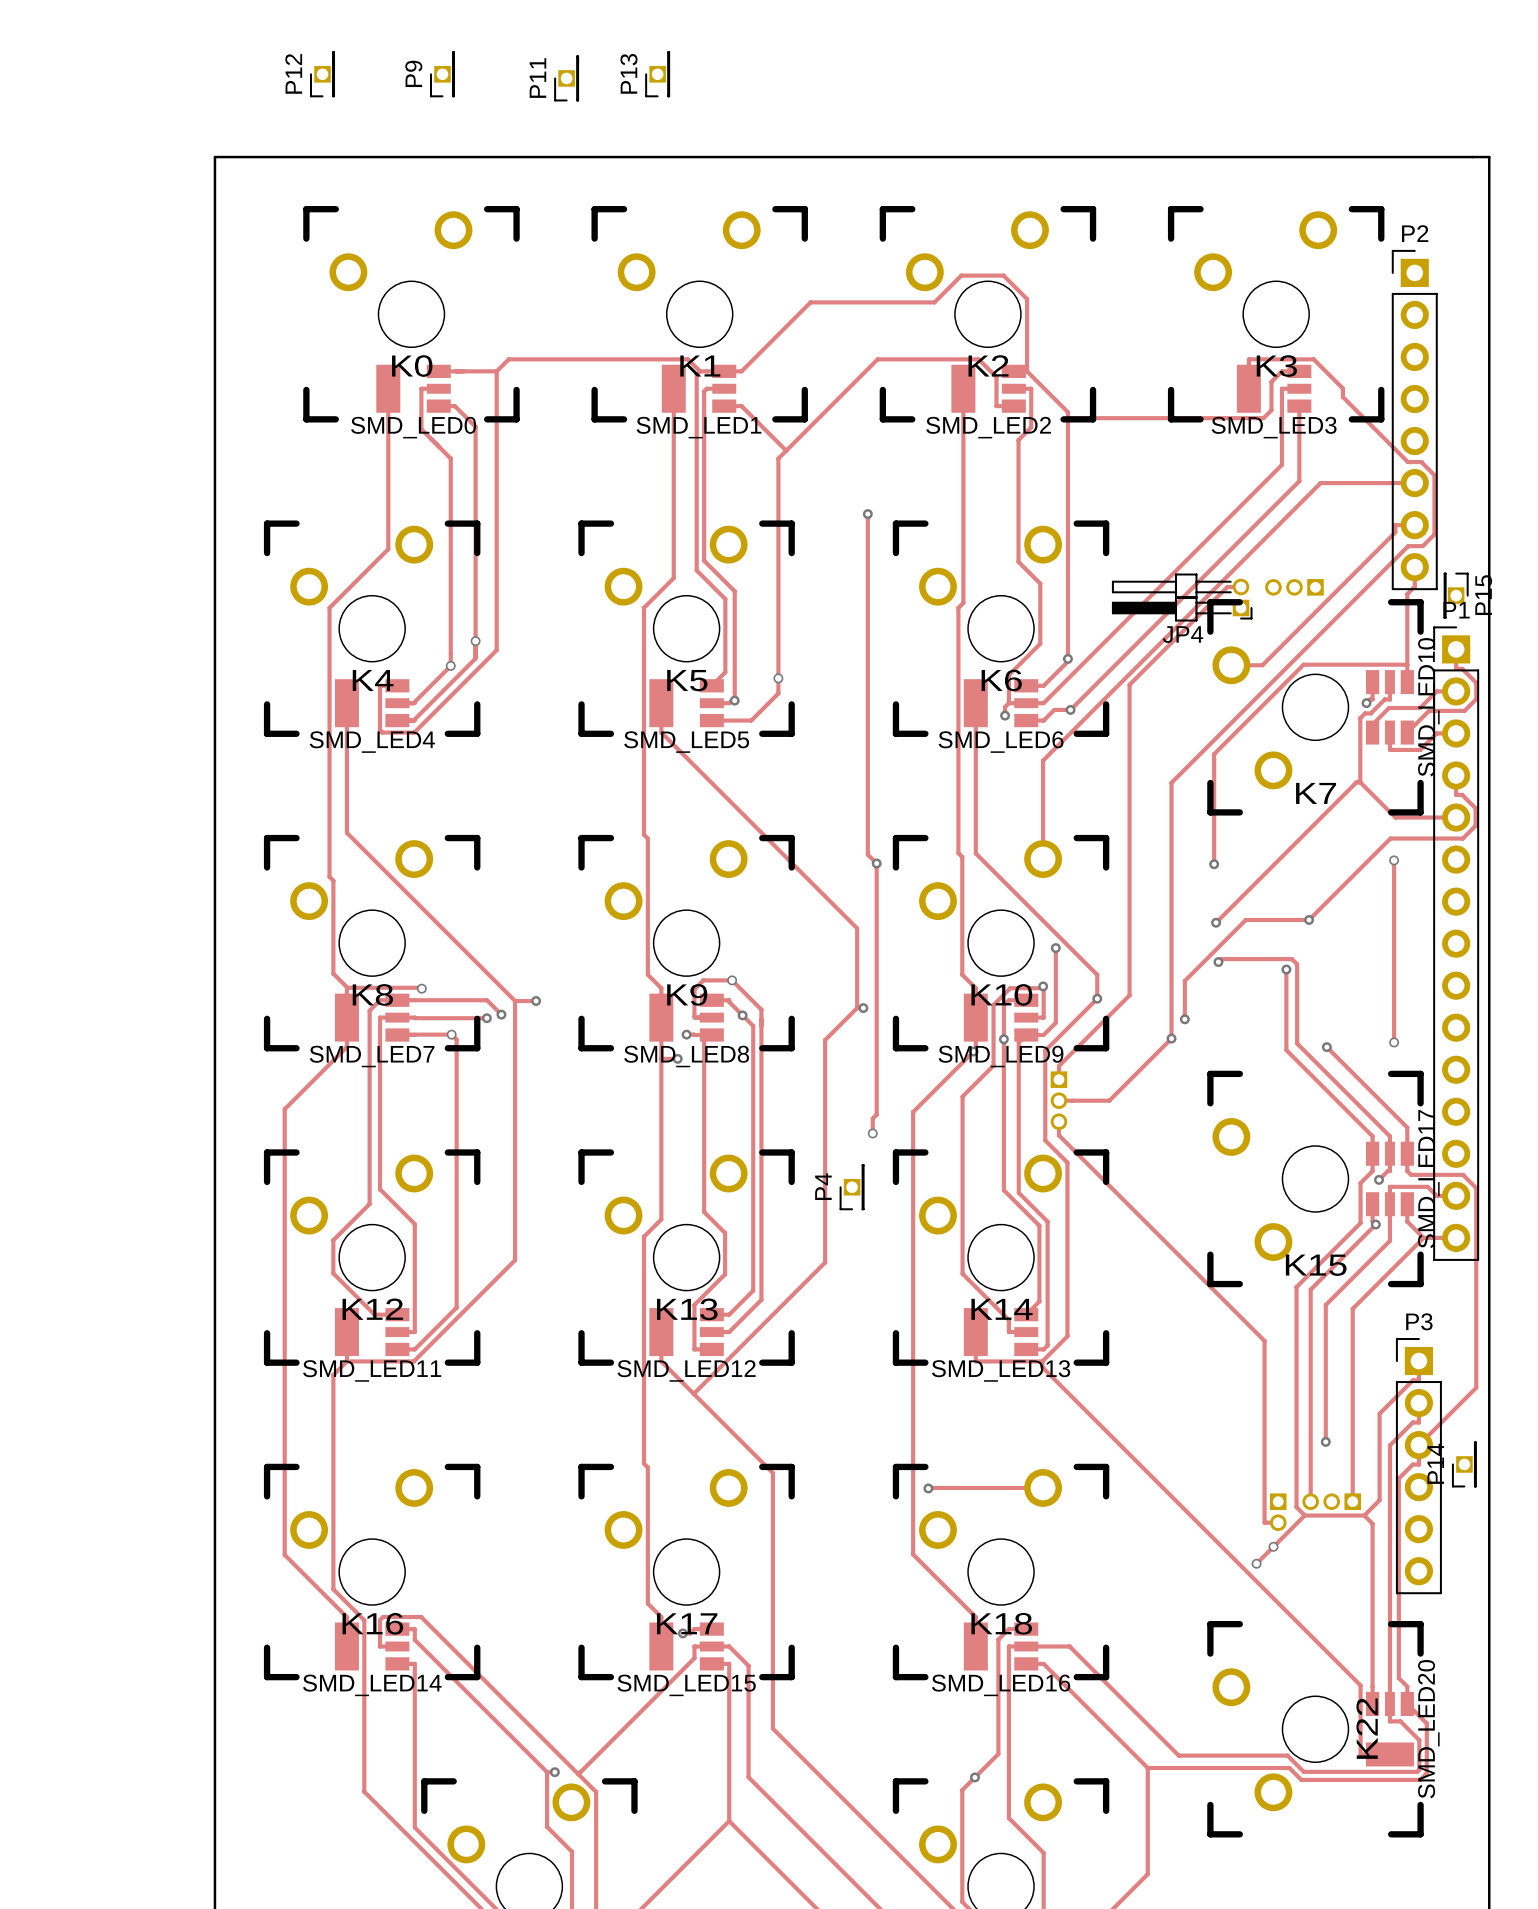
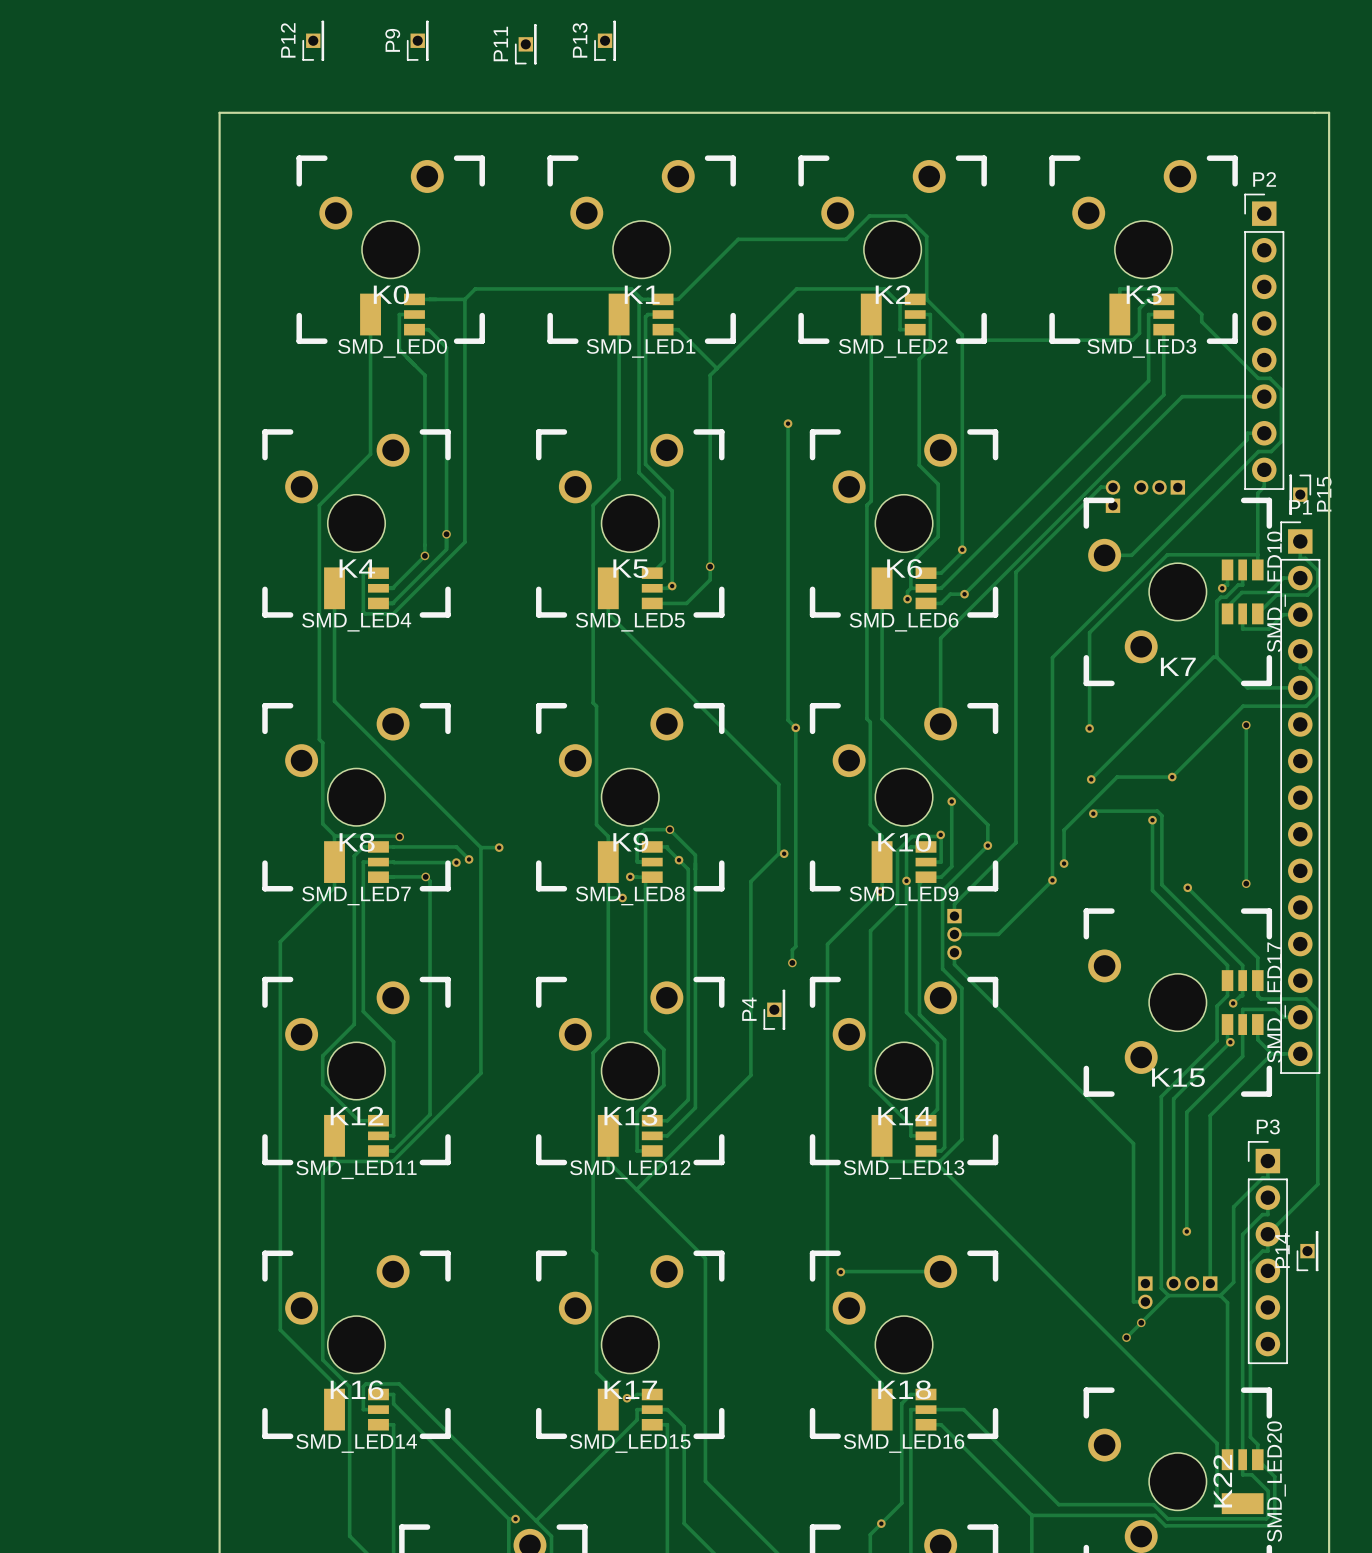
JP4 side: top (1182, 597) -> bottom (1112, 496)

